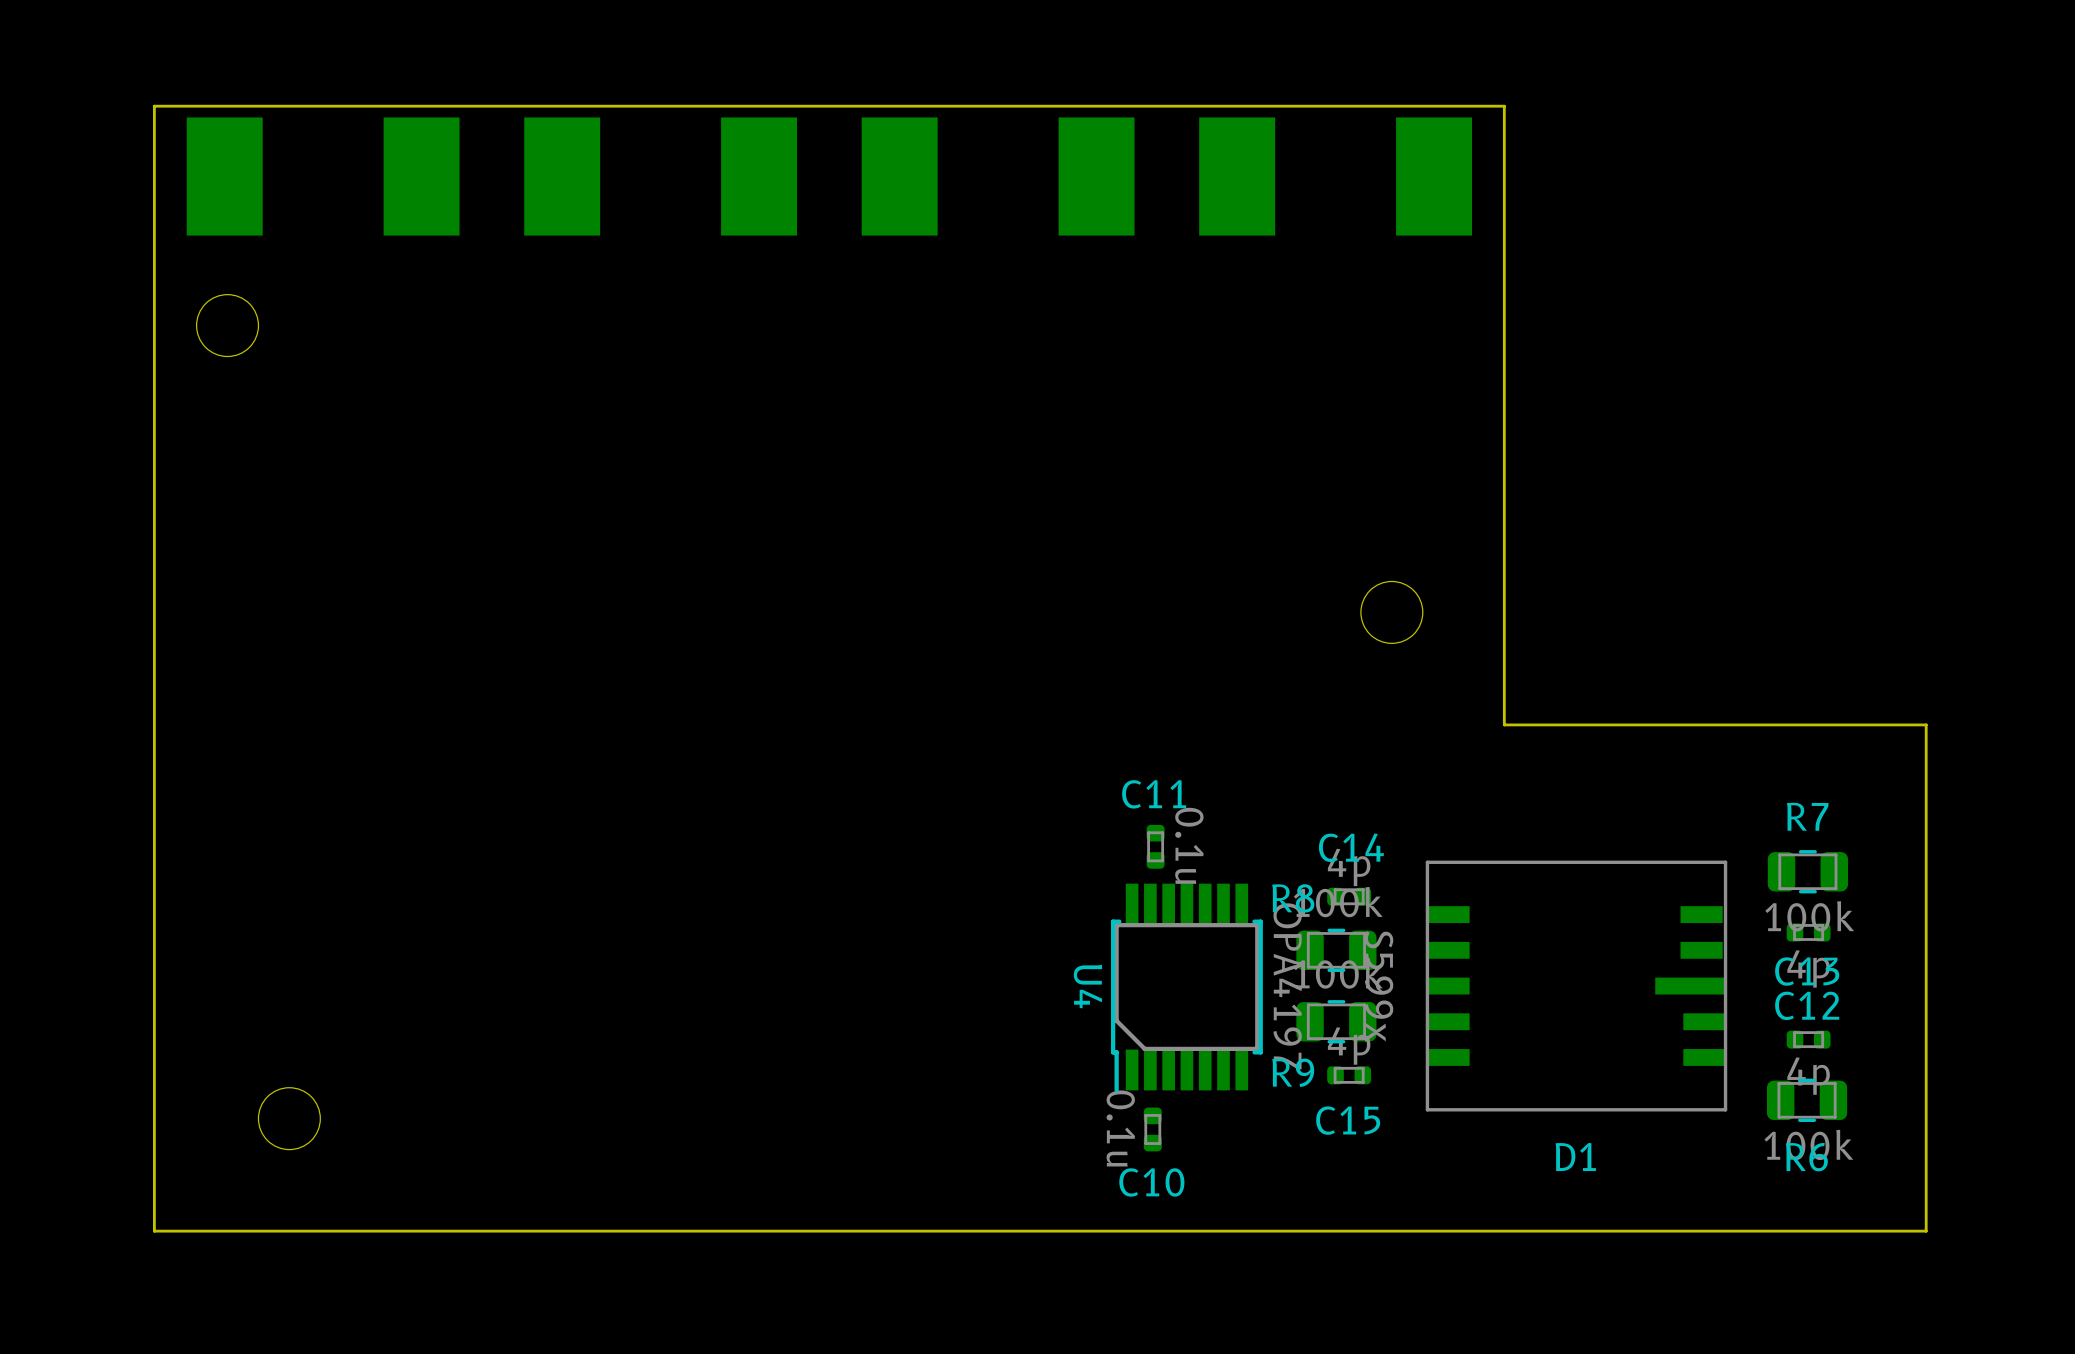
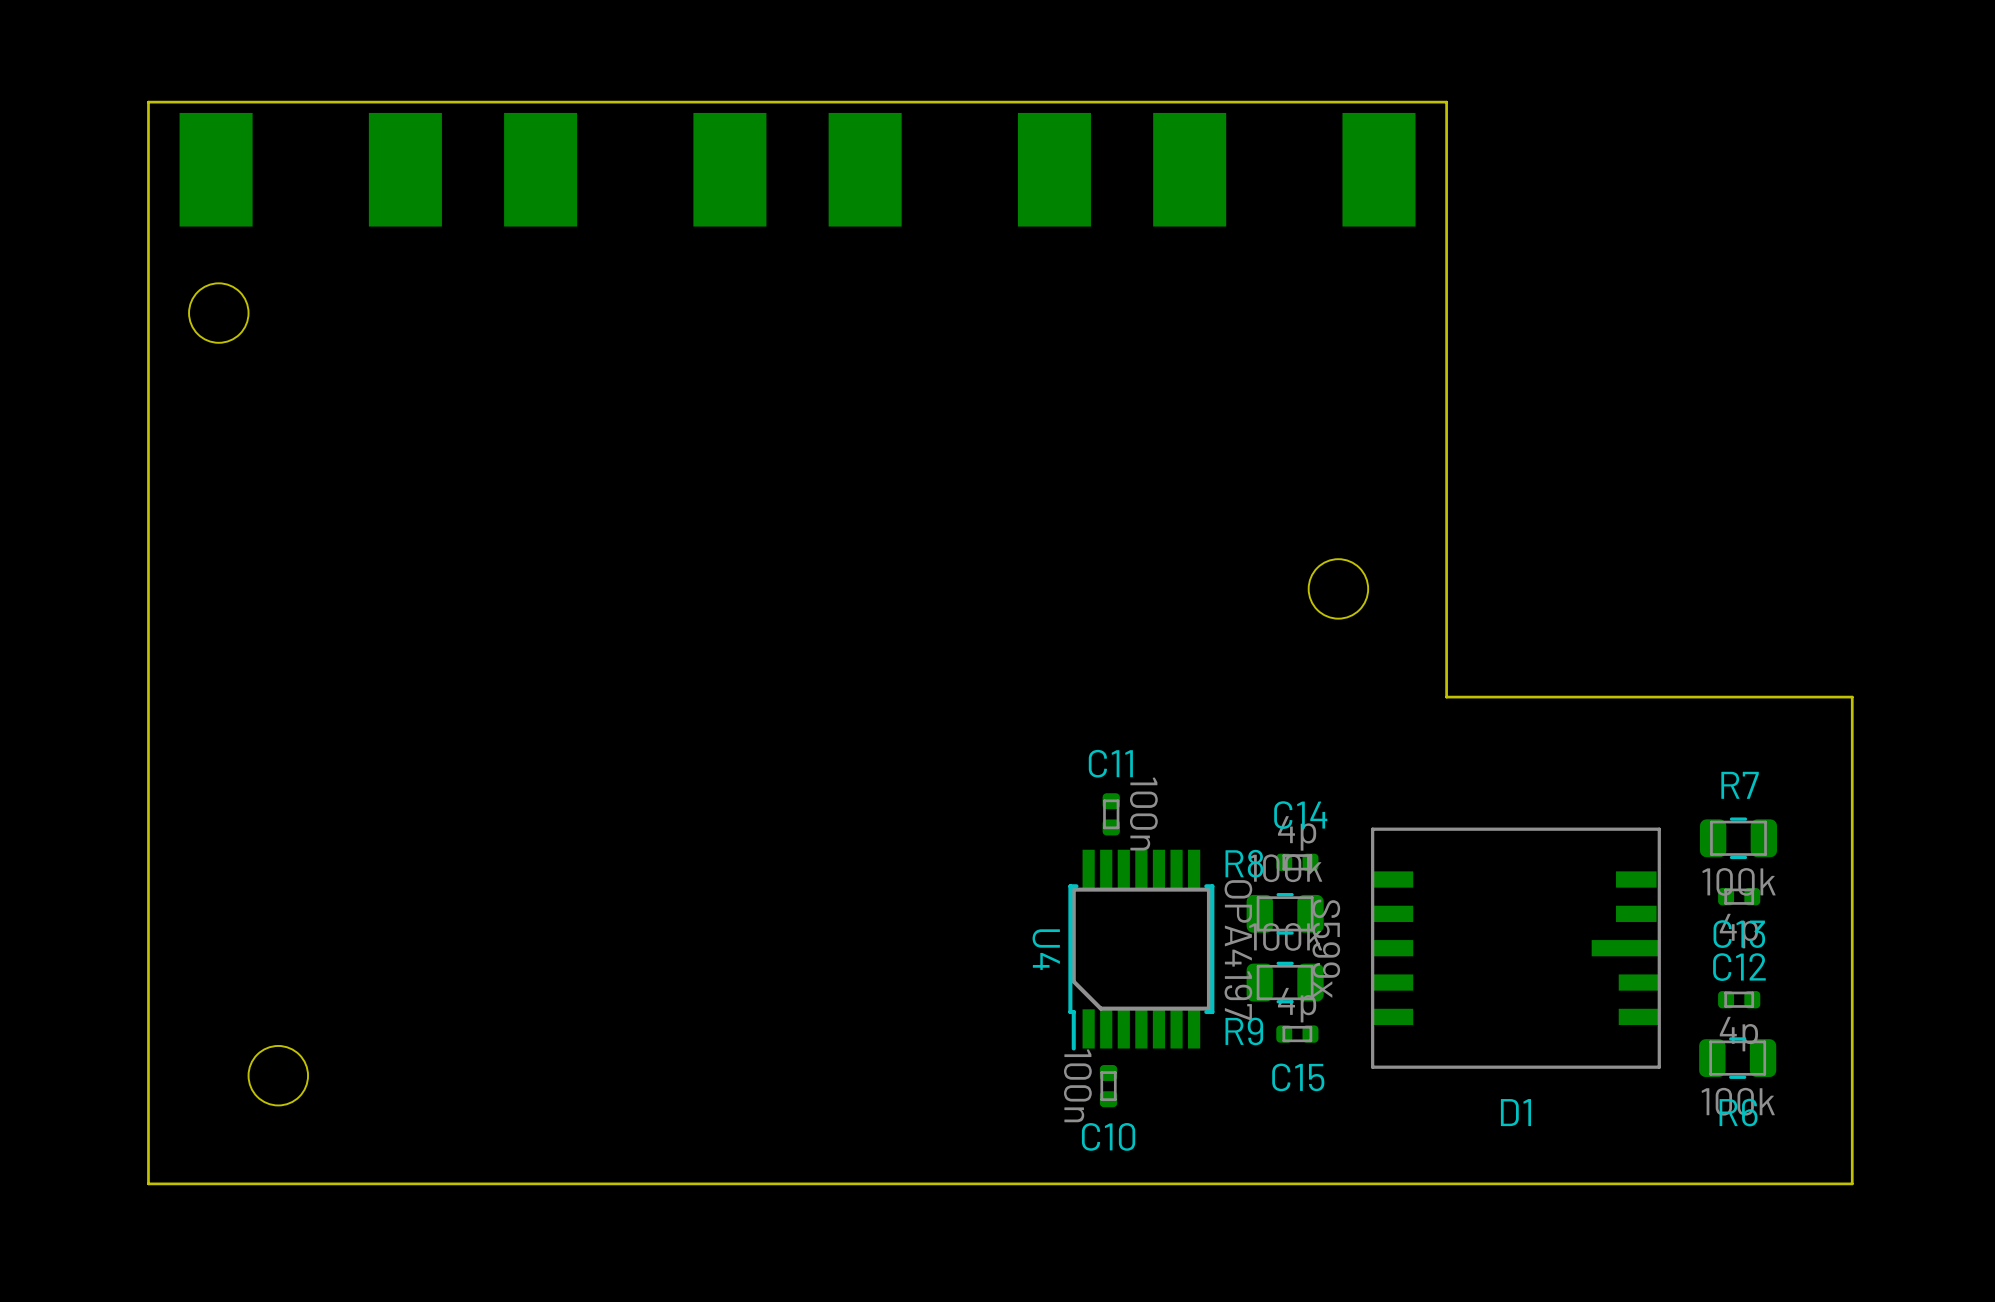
C11 value: 0.1u (1189, 845) -> 100n (1143, 814)
C10 value: 0.1u (1120, 1128) -> 100n (1077, 1085)

